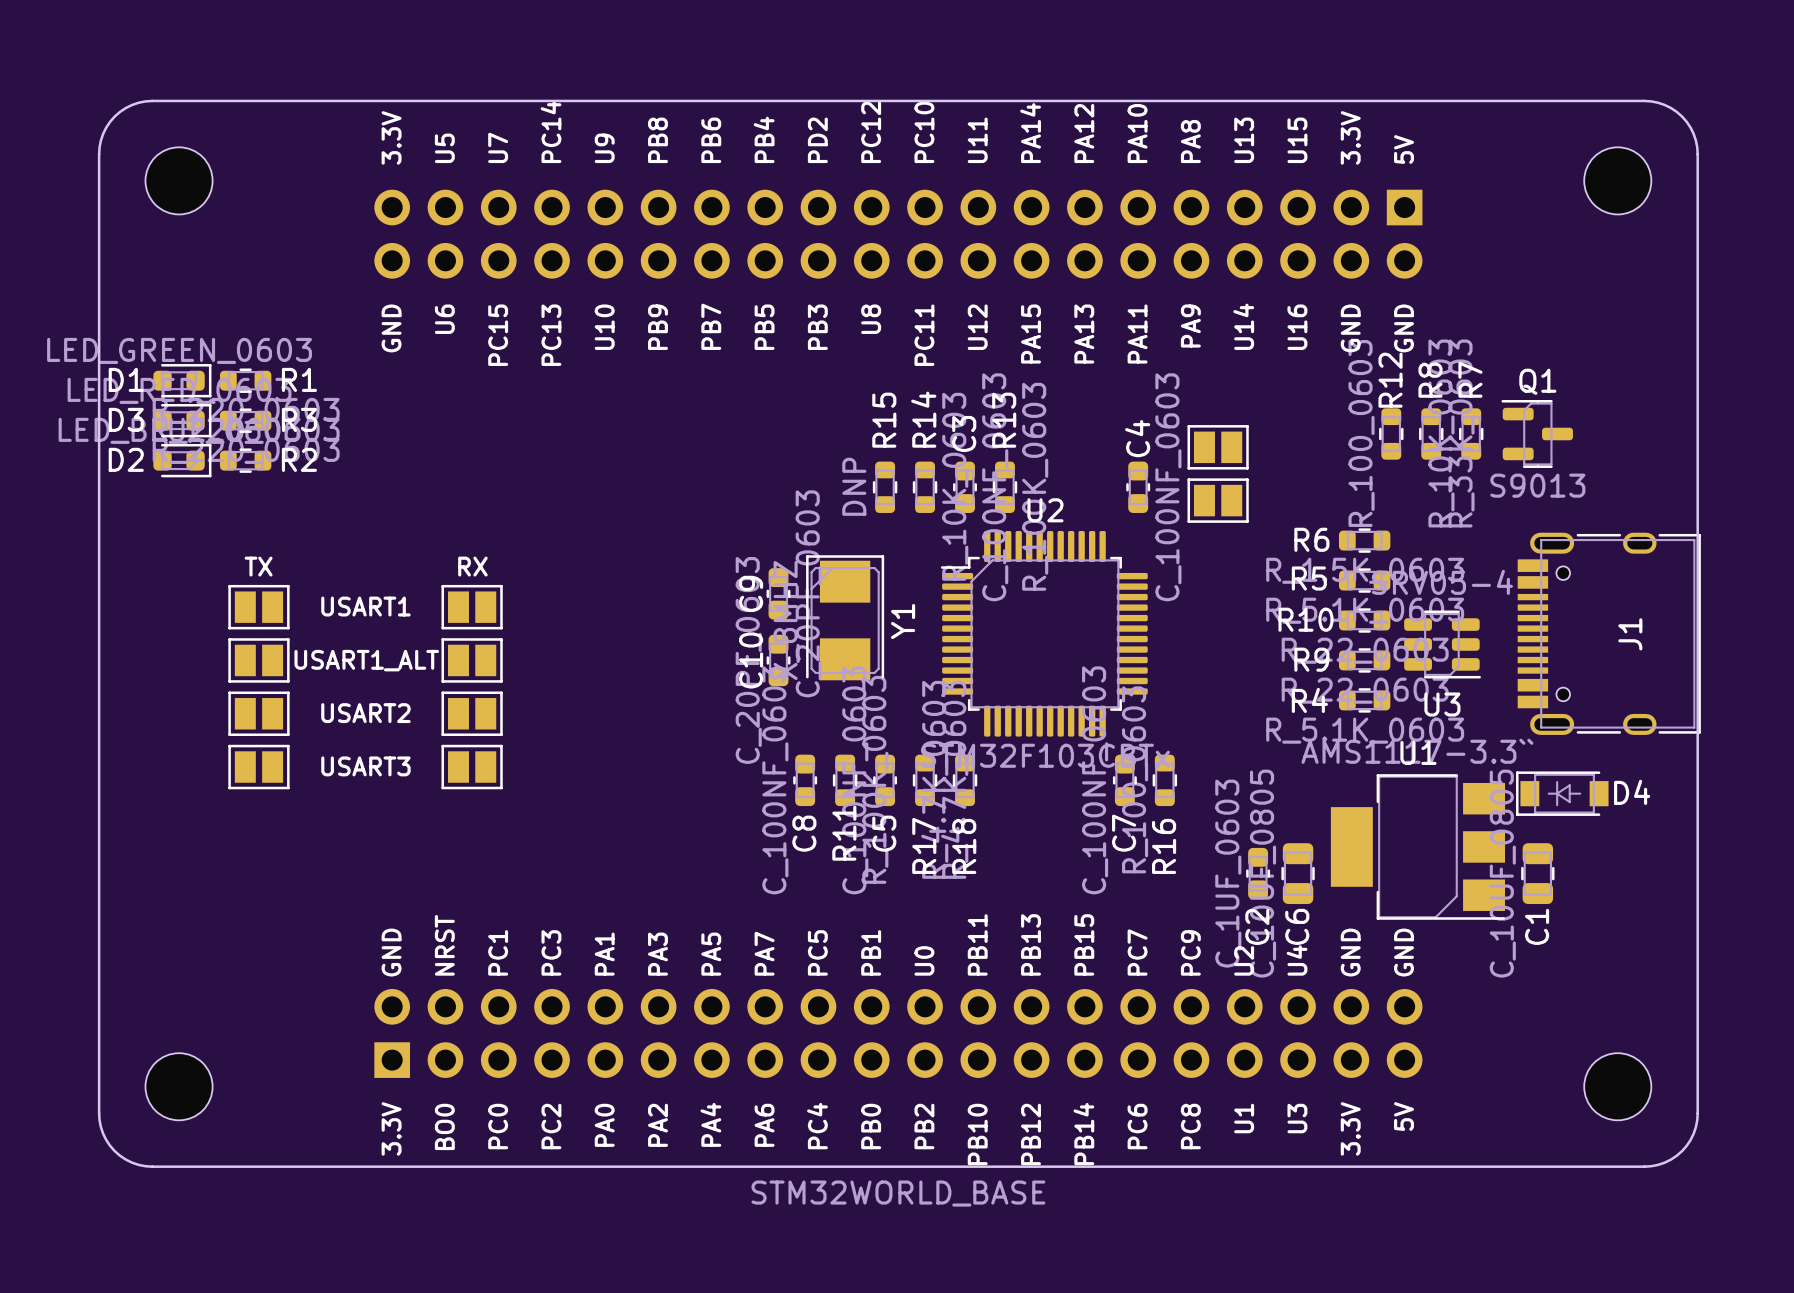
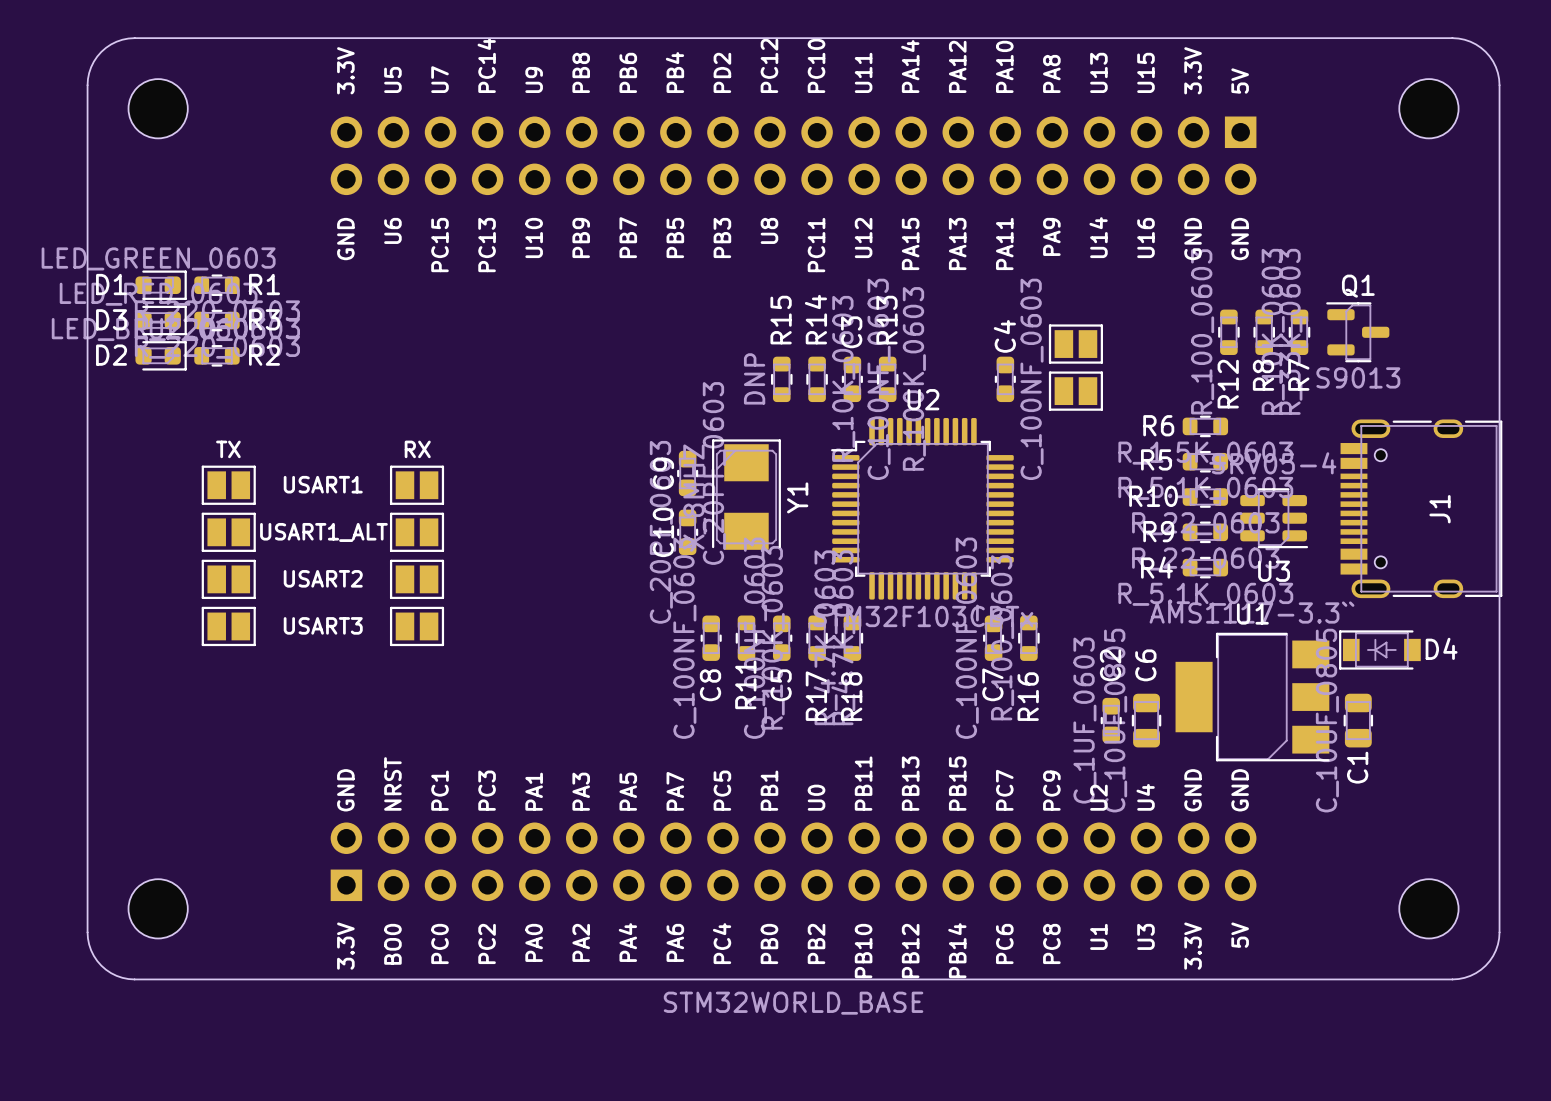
part footprint: [97, 99, 1699, 1168] -> [128, 79, 1459, 939]
board edge: none -> (134, 38) (1452, 38) (1470, 41) (1481, 47) (1493, 61) (1497, 73) (1499, 85) (1499, 932) (1495, 950) (1489, 961) (1476, 973) (1464, 977) (1452, 979) (134, 979) (122, 977) (105, 969) (97, 961) (91, 950) (87, 932) (87, 85) (91, 67) (101, 51) (116, 41) (134, 38)
R7 name position: R7 (1470, 379) -> R7 (1298, 374)
R12 name position: R12 (1390, 380) -> R12 (1228, 384)
R8 name position: R8 (1430, 380) -> R8 (1263, 375)
C2 name position: C2 (1257, 926) -> C2 (1110, 665)
C6 name position: C6 (1297, 926) -> C6 (1145, 665)

